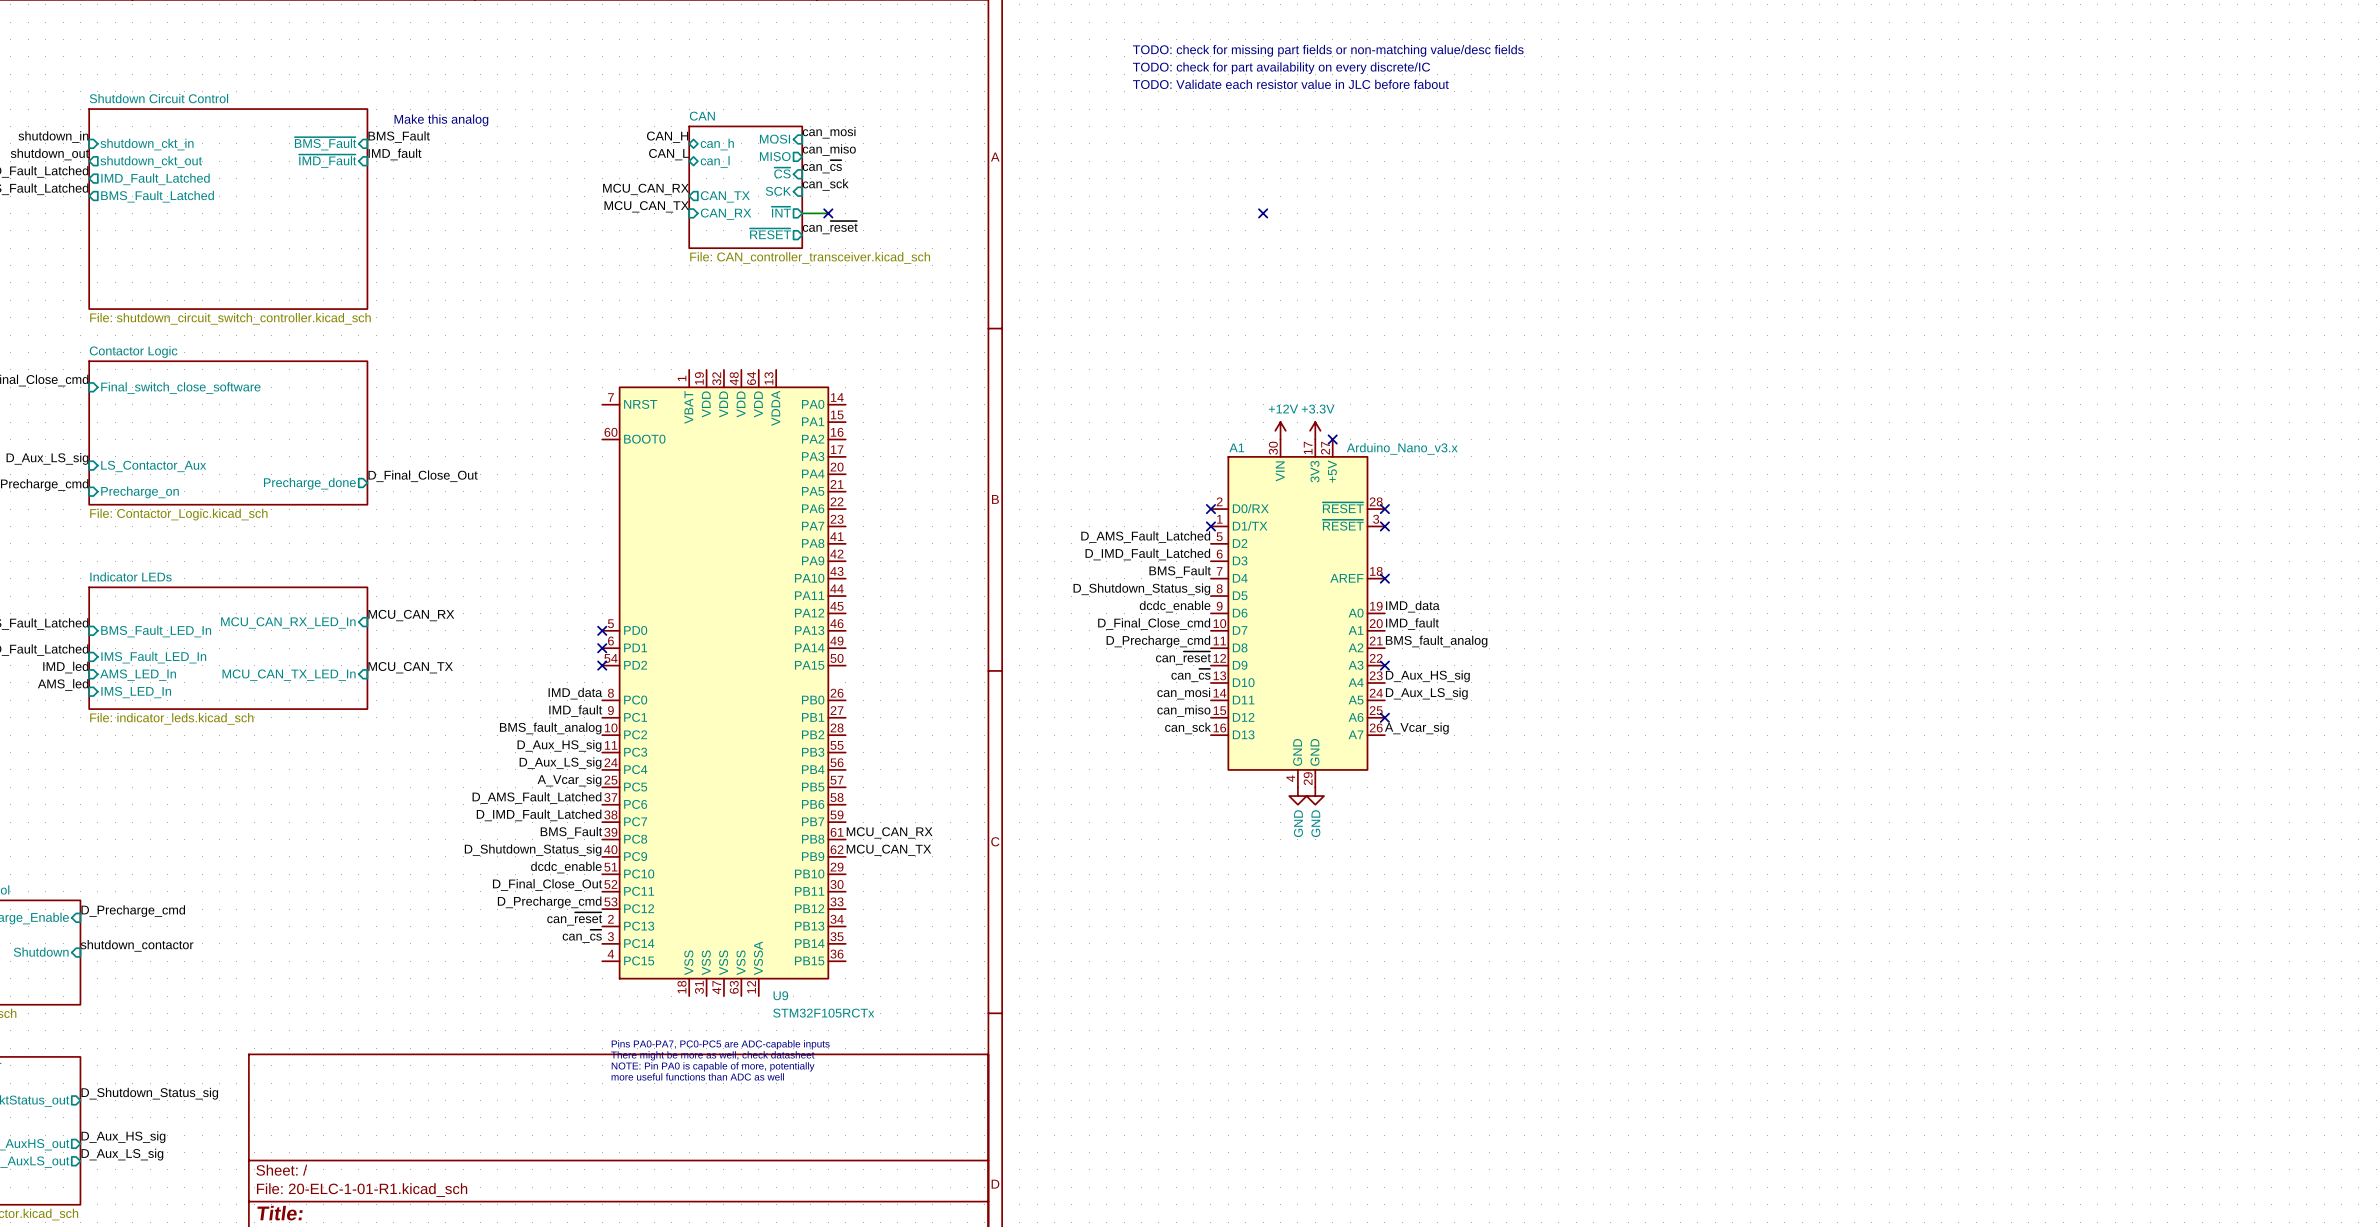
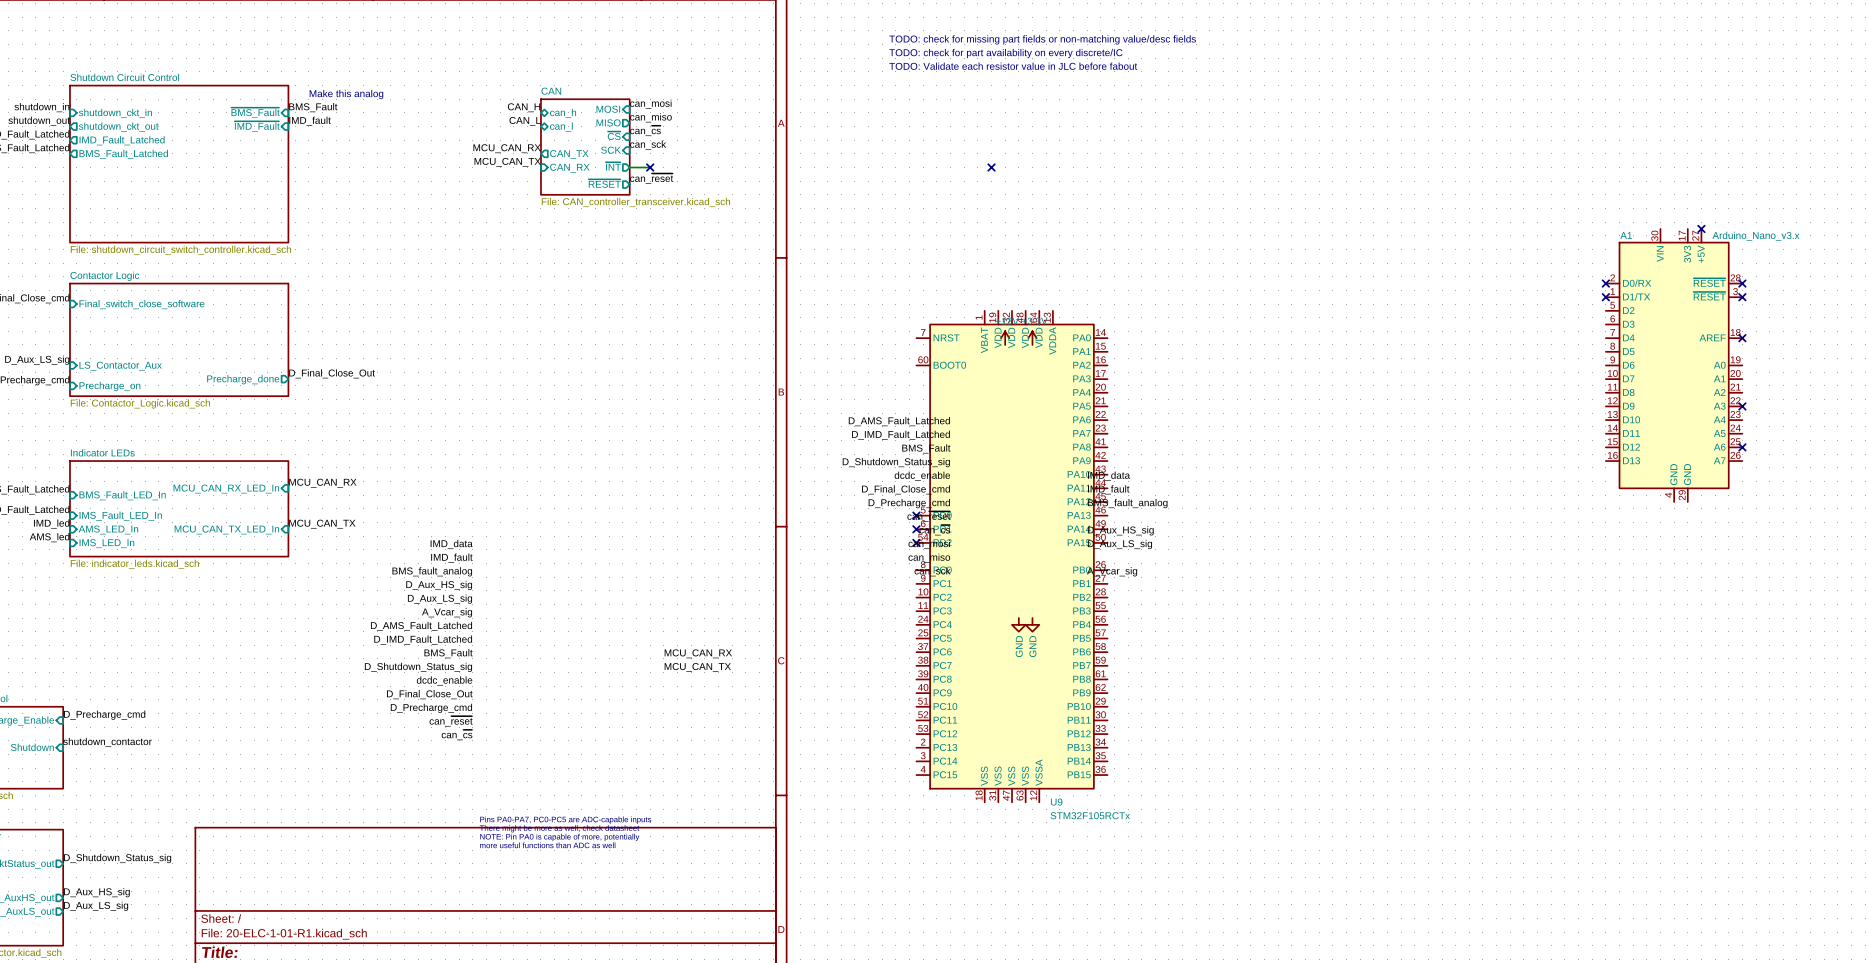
no-connect mark: none -> (1701, 228)
no-connect mark: none -> (1605, 283)
no-connect mark: none -> (1742, 283)
no-connect mark: none -> (1605, 297)
no-connect mark: none -> (1742, 297)
no-connect mark: none -> (1742, 338)
no-connect mark: (1332, 439) -> none
no-connect mark: (1210, 509) -> none
no-connect mark: (1384, 509) -> none
no-connect mark: none -> (1742, 406)
no-connect mark: (1210, 526) -> none
no-connect mark: (1384, 526) -> none
no-connect mark: none -> (1742, 447)
no-connect mark: (1384, 578) -> none
A1 position: (1297, 613) -> (1674, 365)
no-connect mark: (602, 630) -> none
no-connect mark: (602, 648) -> none
no-connect mark: none -> (916, 515)
no-connect mark: (602, 665) -> none
no-connect mark: (1384, 665) -> none
no-connect mark: none -> (916, 529)
U9 position: (723, 682) -> (1011, 556)
no-connect mark: none -> (916, 542)
no-connect mark: (1384, 717) -> none

